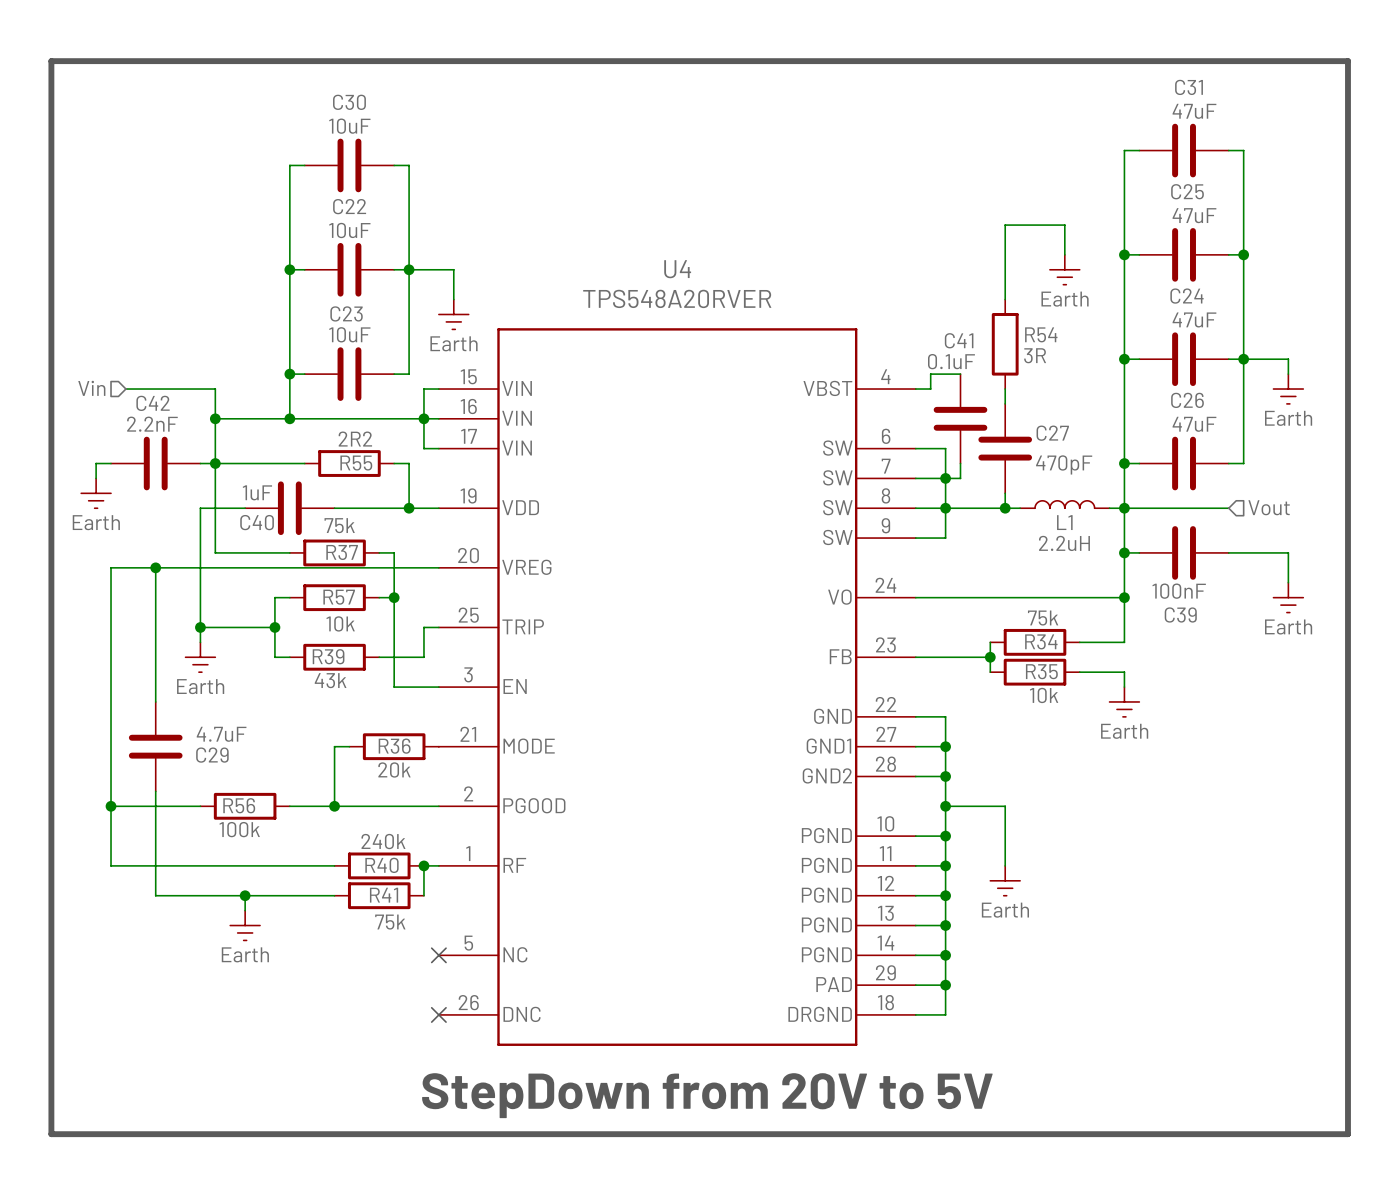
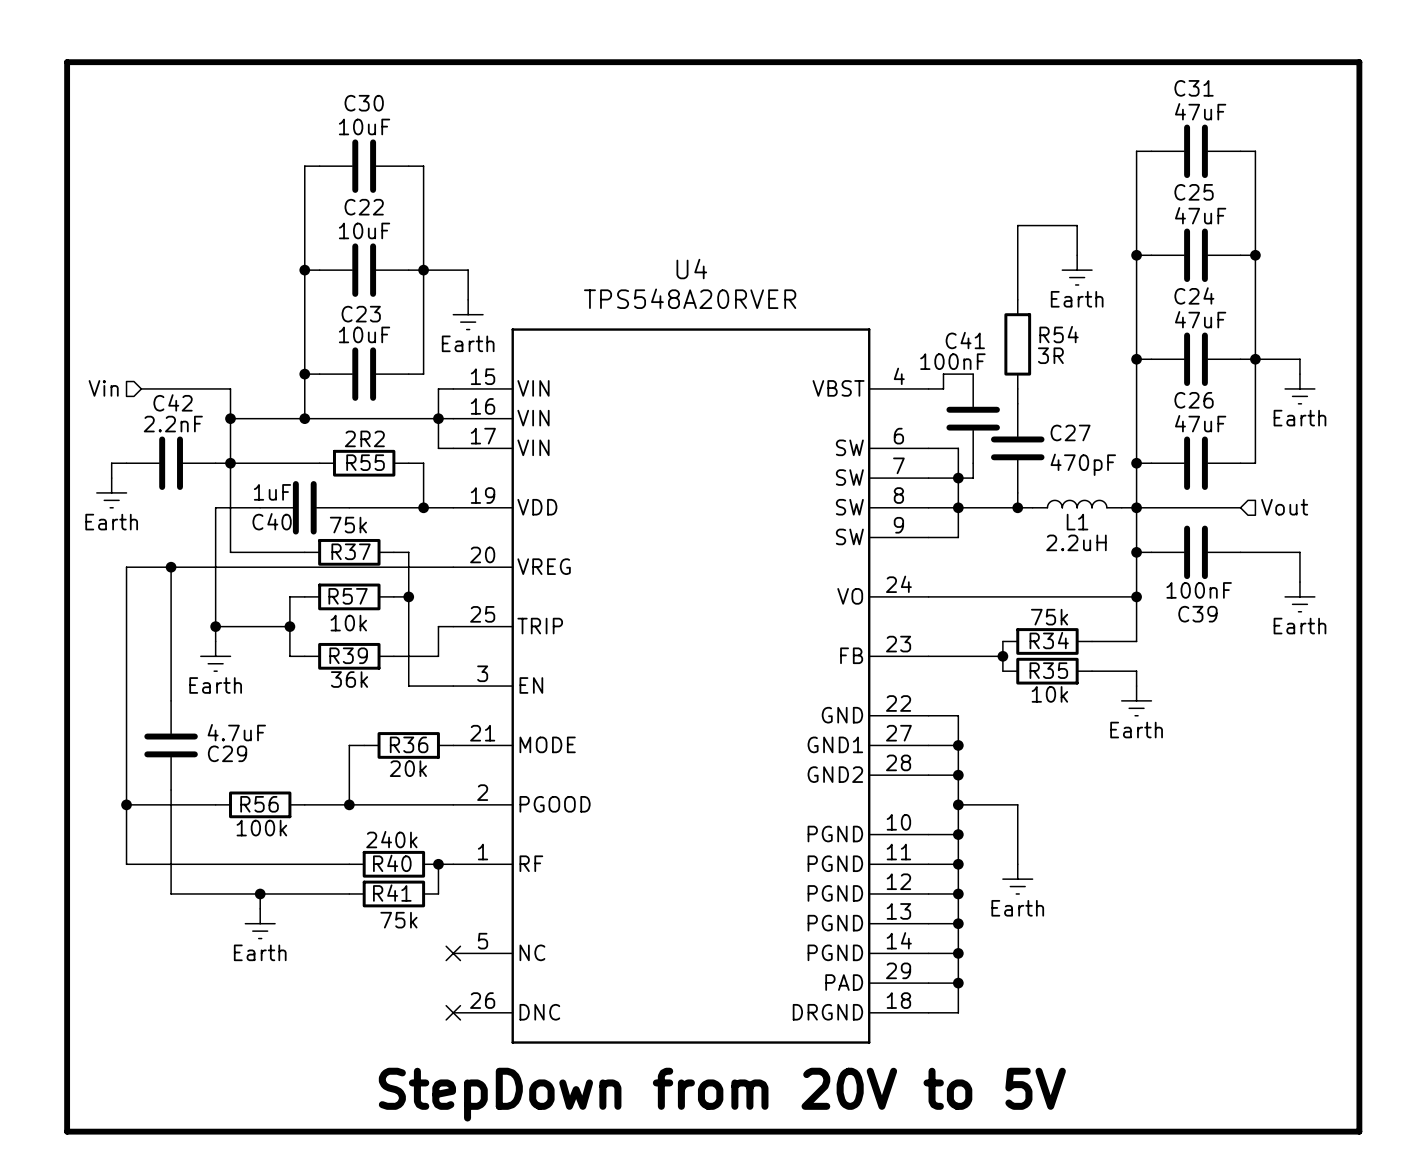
C41 value: 0.1uF (951, 361) -> 100nF (952, 361)
R39 value: 43k (330, 680) -> 36k (349, 679)

